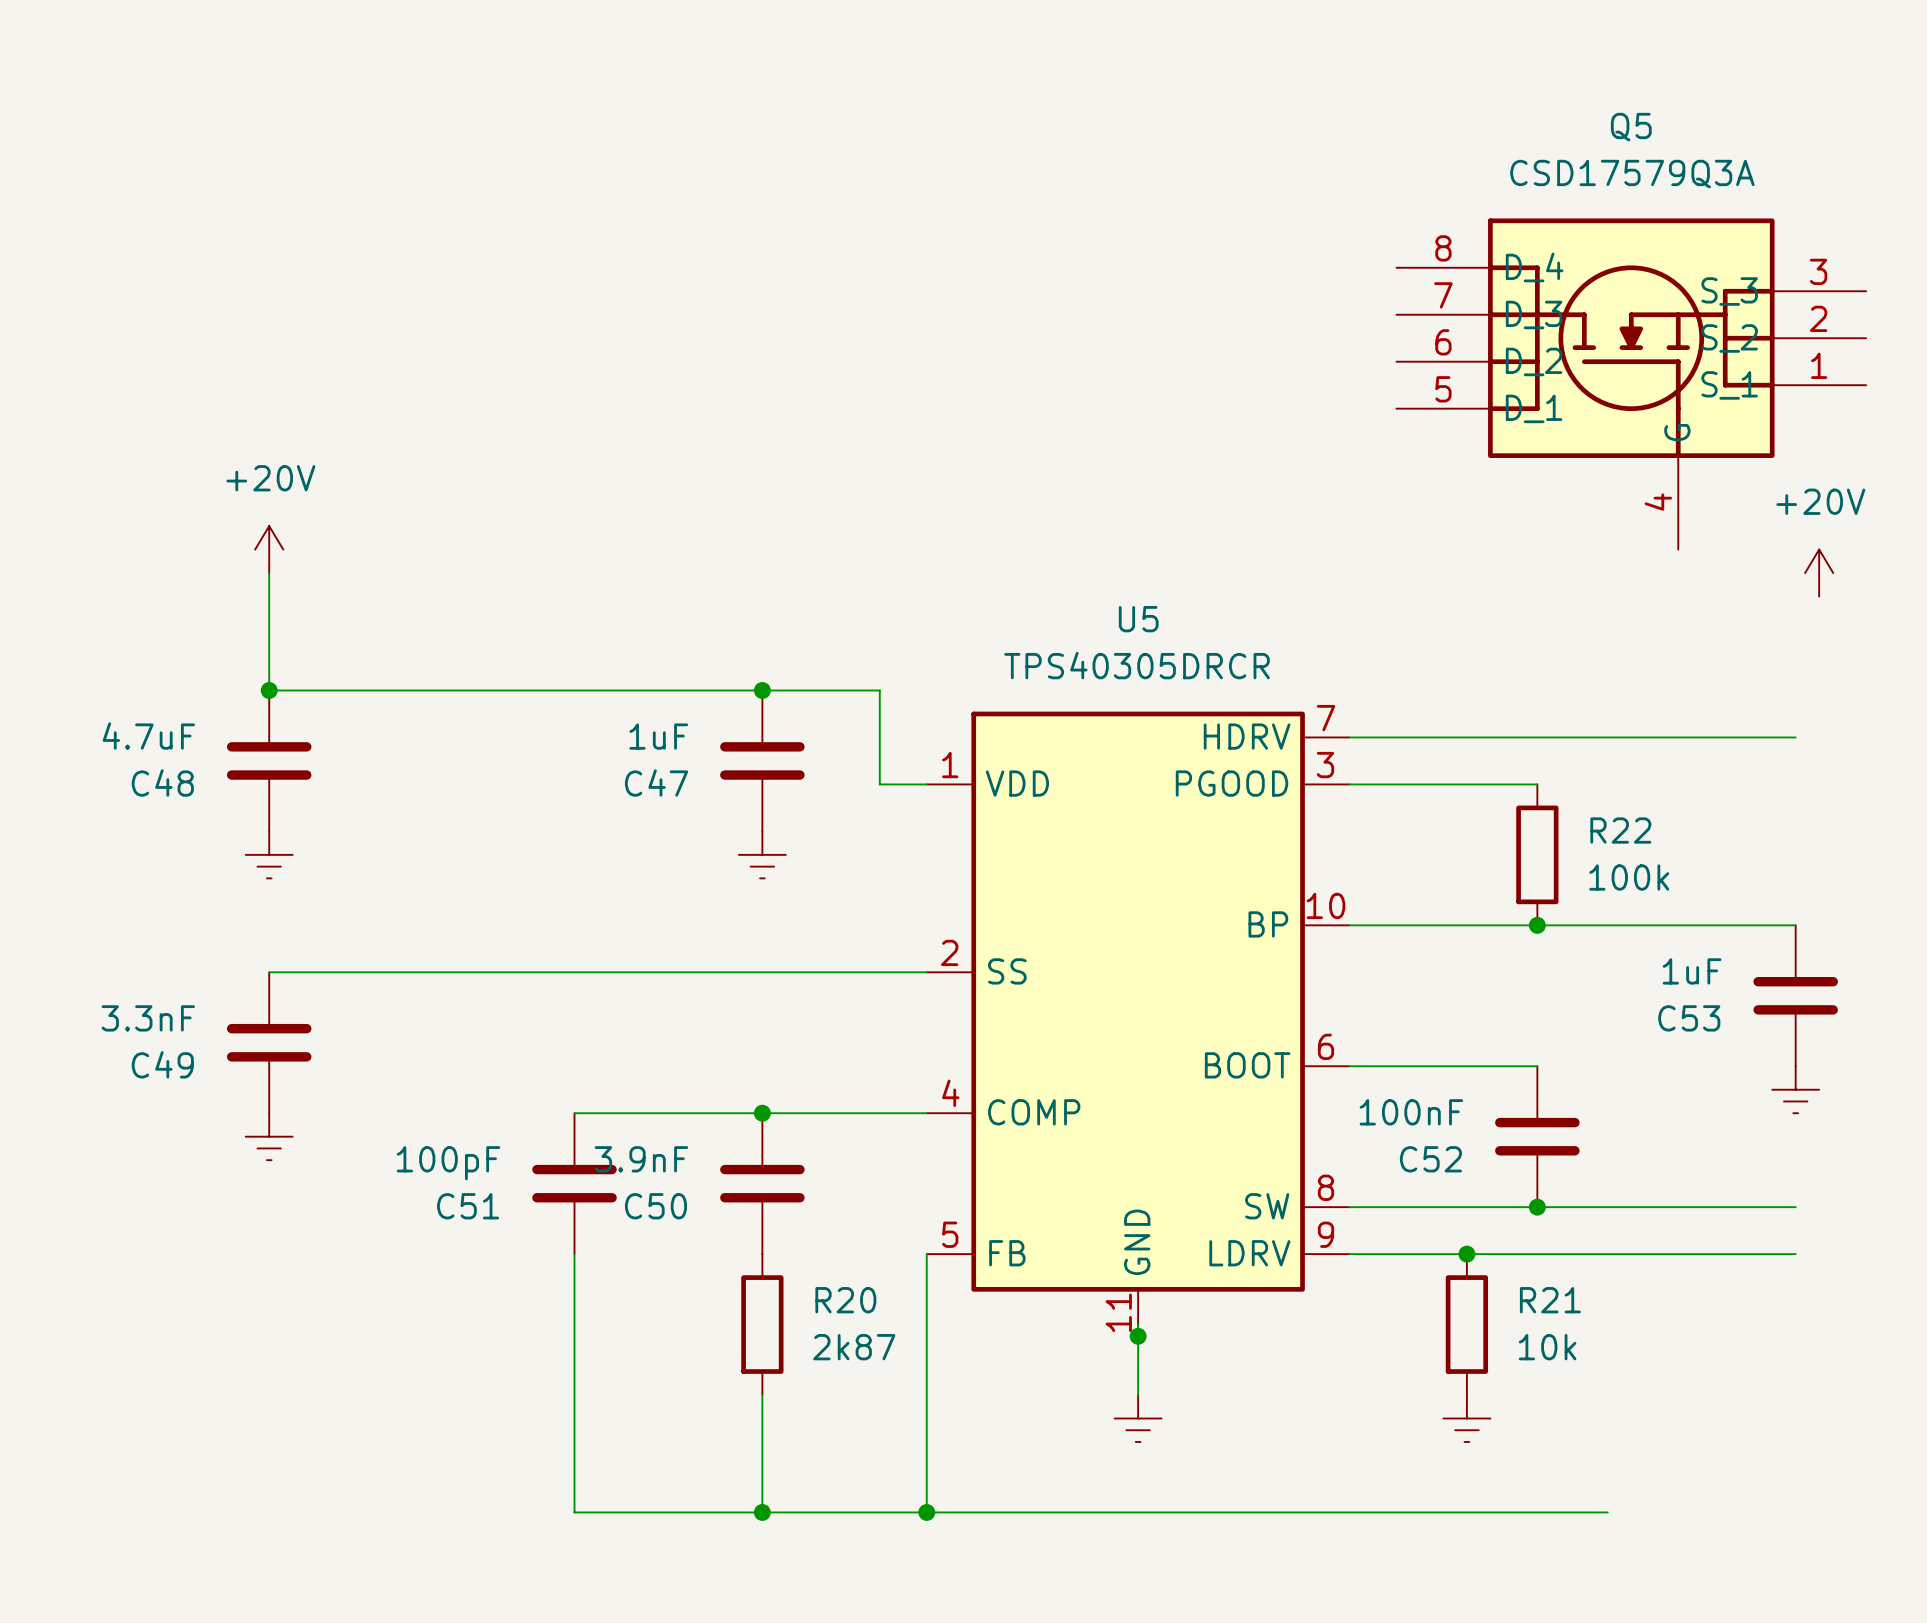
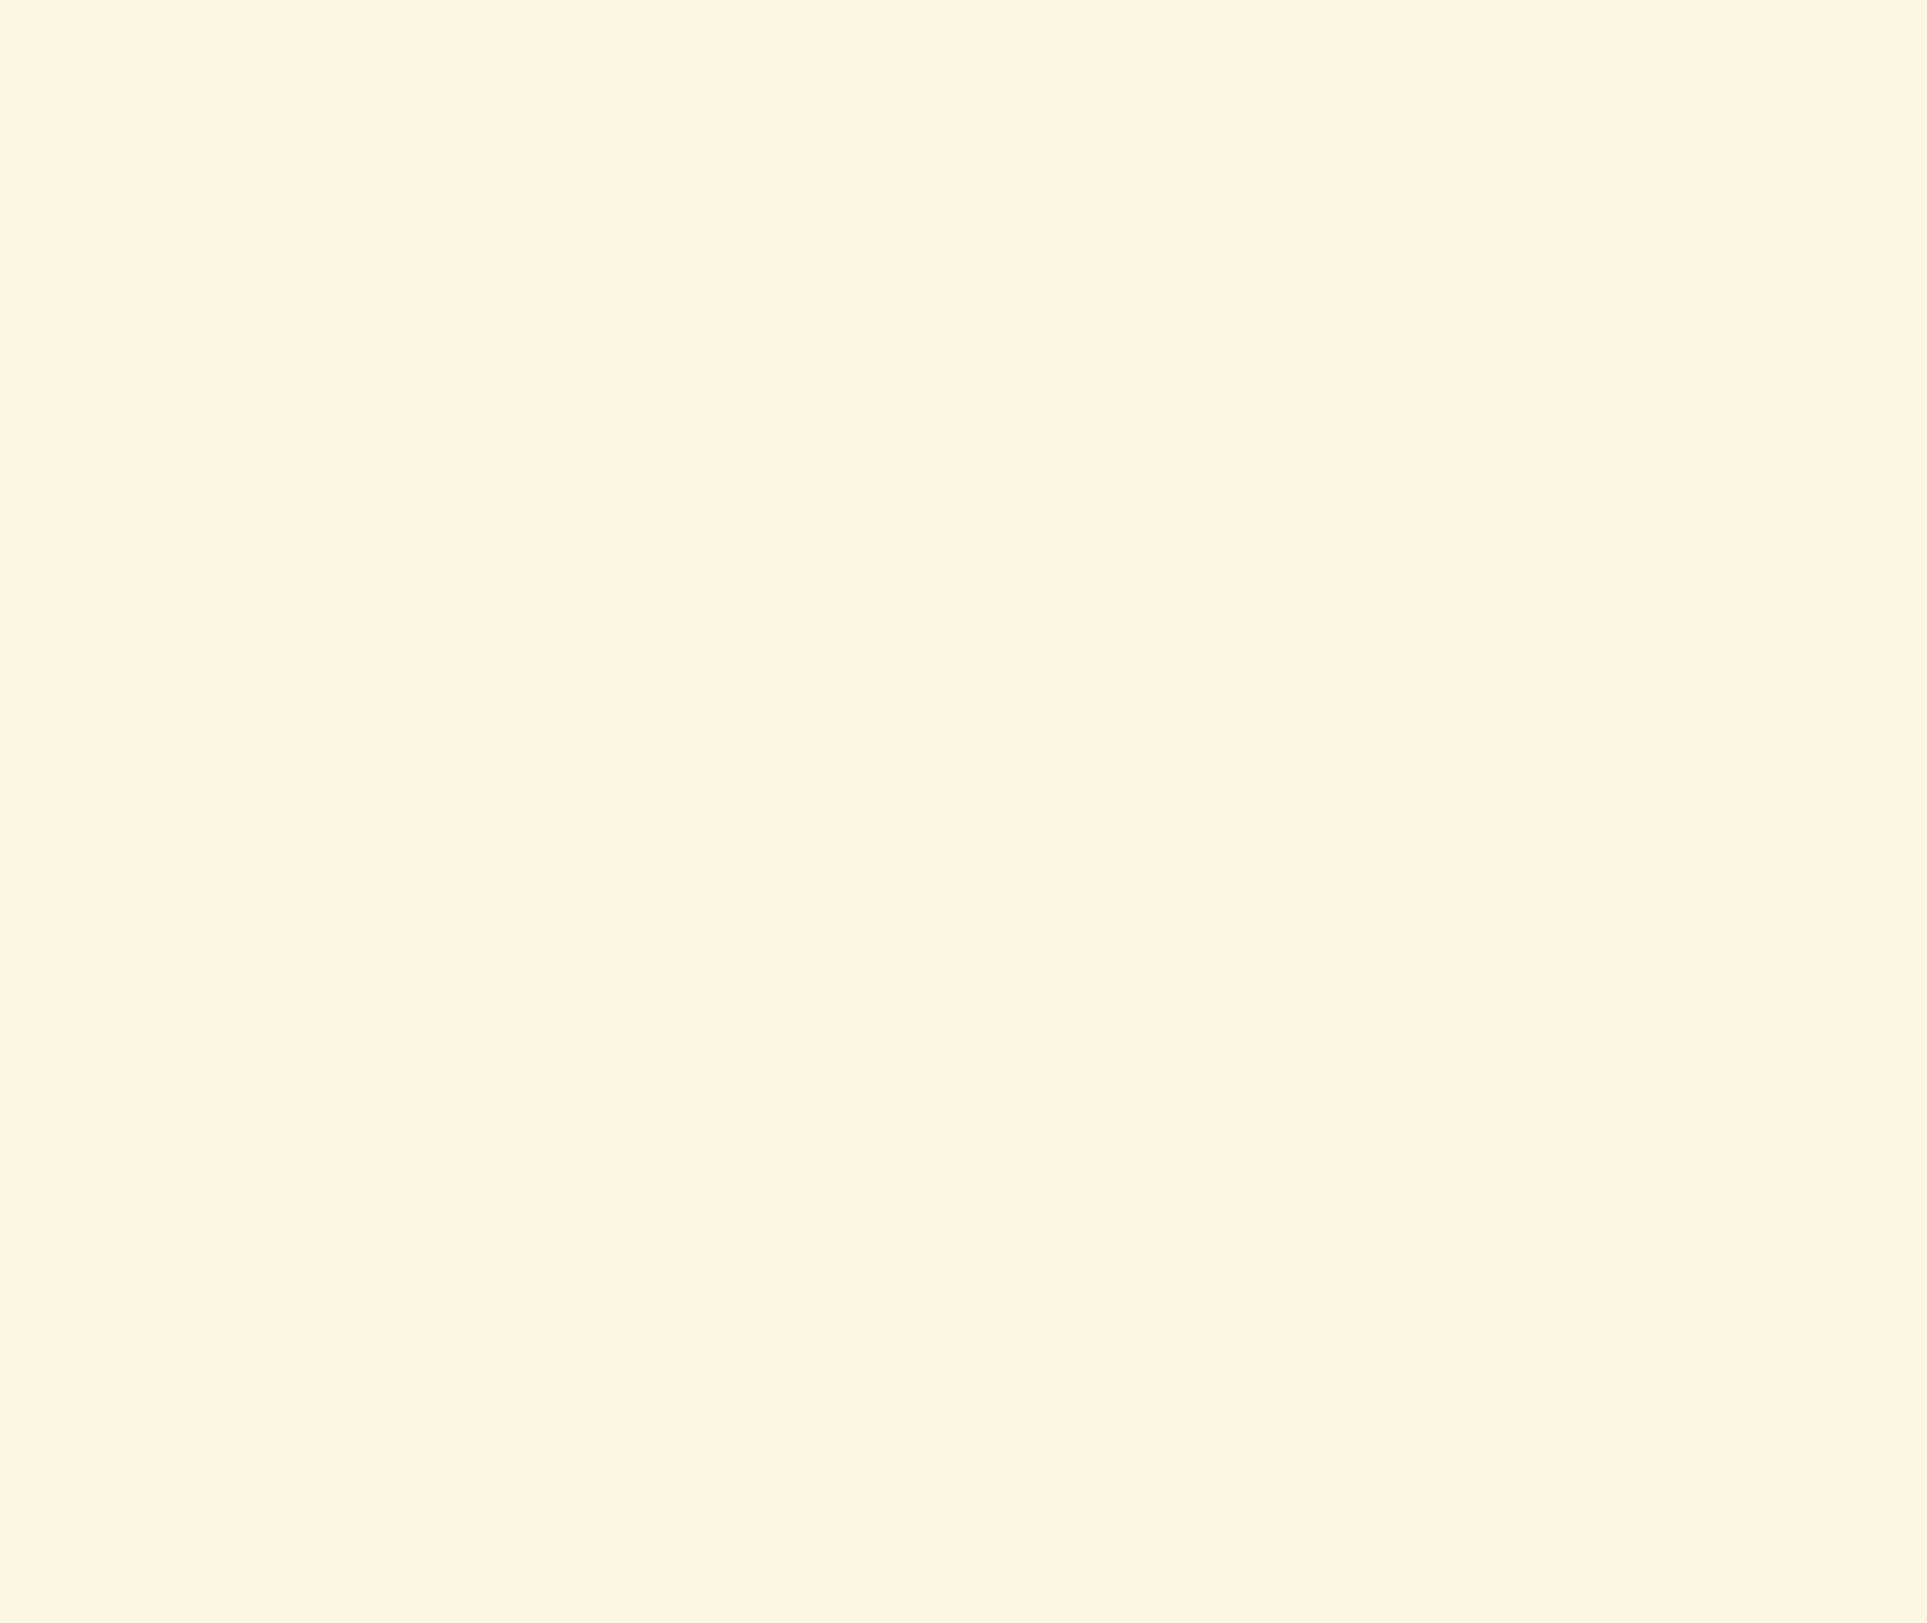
Q5: CSD17579Q3A (1631, 384) -> none
power symbol: +20V (269, 549) -> none
wire: (269, 573) (269, 690) (879, 690) (879, 784) (926, 784) -> none
power symbol: +20V (1819, 573) -> none
junction: (269, 690) -> none
junction: (762, 690) -> none
wire: (1349, 737) (1795, 737) -> none
C48: 4.7uF (269, 760) -> none
C47: 1uF (762, 760) -> none
wire: (1349, 784) (1537, 784) -> none
power symbol: (269, 854) -> none
power symbol: (762, 854) -> none
R22: 100k (1537, 854) -> none
wire: (1349, 925) (1795, 925) -> none
junction: (1537, 925) -> none
wire: (269, 972) (926, 972) -> none
C53: 1uF (1795, 995) -> none
U5: TPS40305DRCR (1138, 1023) -> none
C49: 3.3nF (269, 1042) -> none
wire: (1349, 1066) (1537, 1066) -> none
power symbol: (1795, 1089) -> none
wire: (574, 1113) (926, 1113) -> none
junction: (762, 1113) -> none
power symbol: (269, 1136) -> none
C52: 100nF (1537, 1136) -> none
C51: 100pF (574, 1183) -> none
C50: 3.9nF (762, 1183) -> none
wire: (1349, 1207) (1795, 1207) -> none
junction: (1537, 1207) -> none
wire: (574, 1254) (574, 1512) (1607, 1512) -> none
wire: (926, 1254) (926, 1512) -> none
wire: (1349, 1254) (1795, 1254) -> none
junction: (1466, 1254) -> none
R20: 2k87 (762, 1324) -> none
wire: (1138, 1324) (1138, 1395) -> none
R21: 10k (1466, 1324) -> none
junction: (1138, 1336) -> none
wire: (762, 1395) (762, 1512) -> none
power symbol: (1138, 1418) -> none
power symbol: (1466, 1418) -> none
junction: (762, 1512) -> none
junction: (926, 1512) -> none

